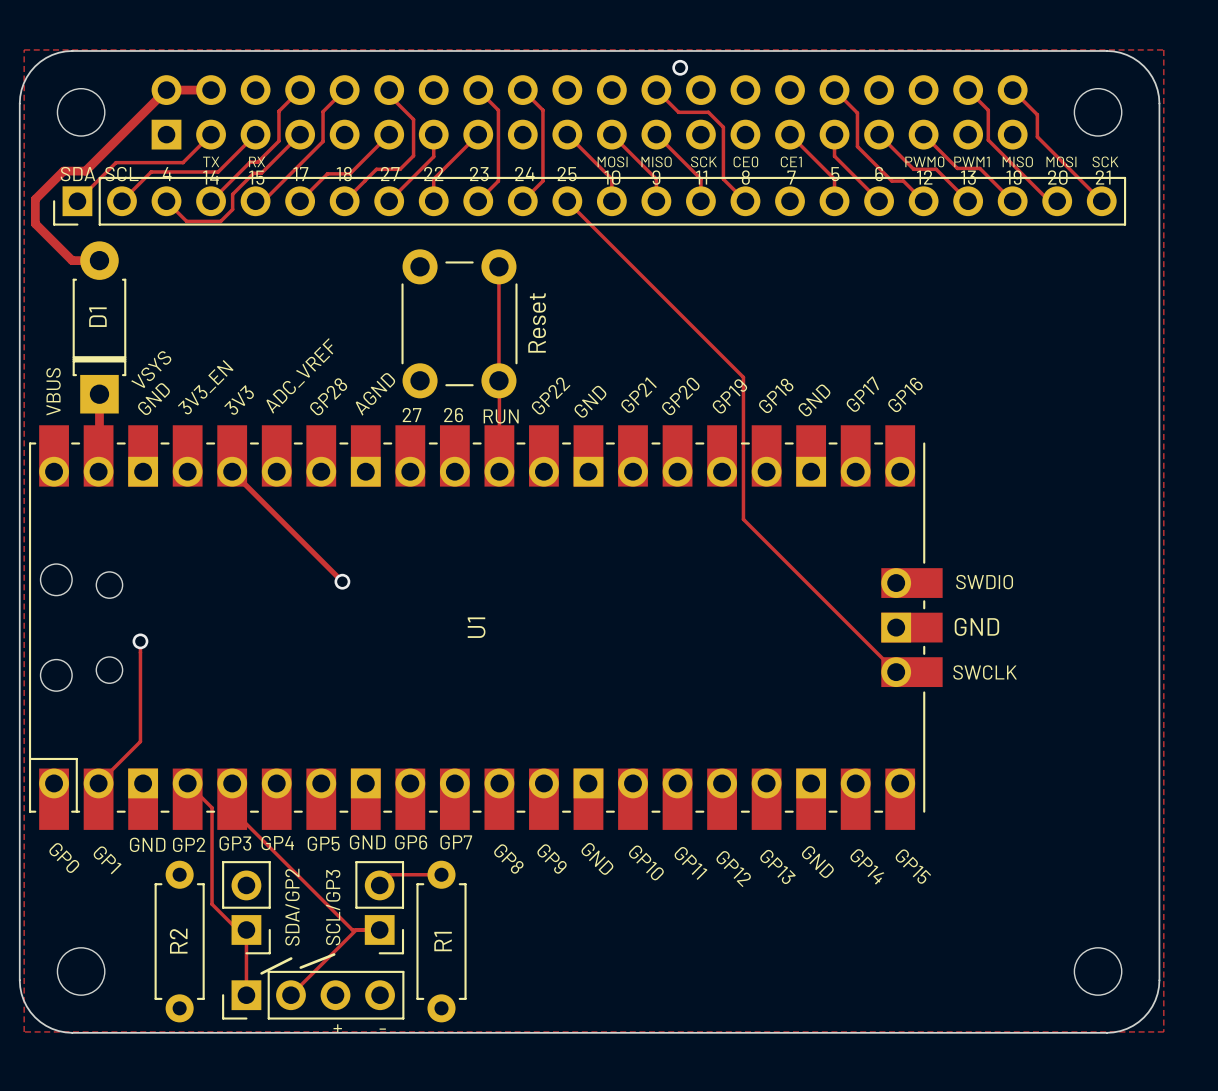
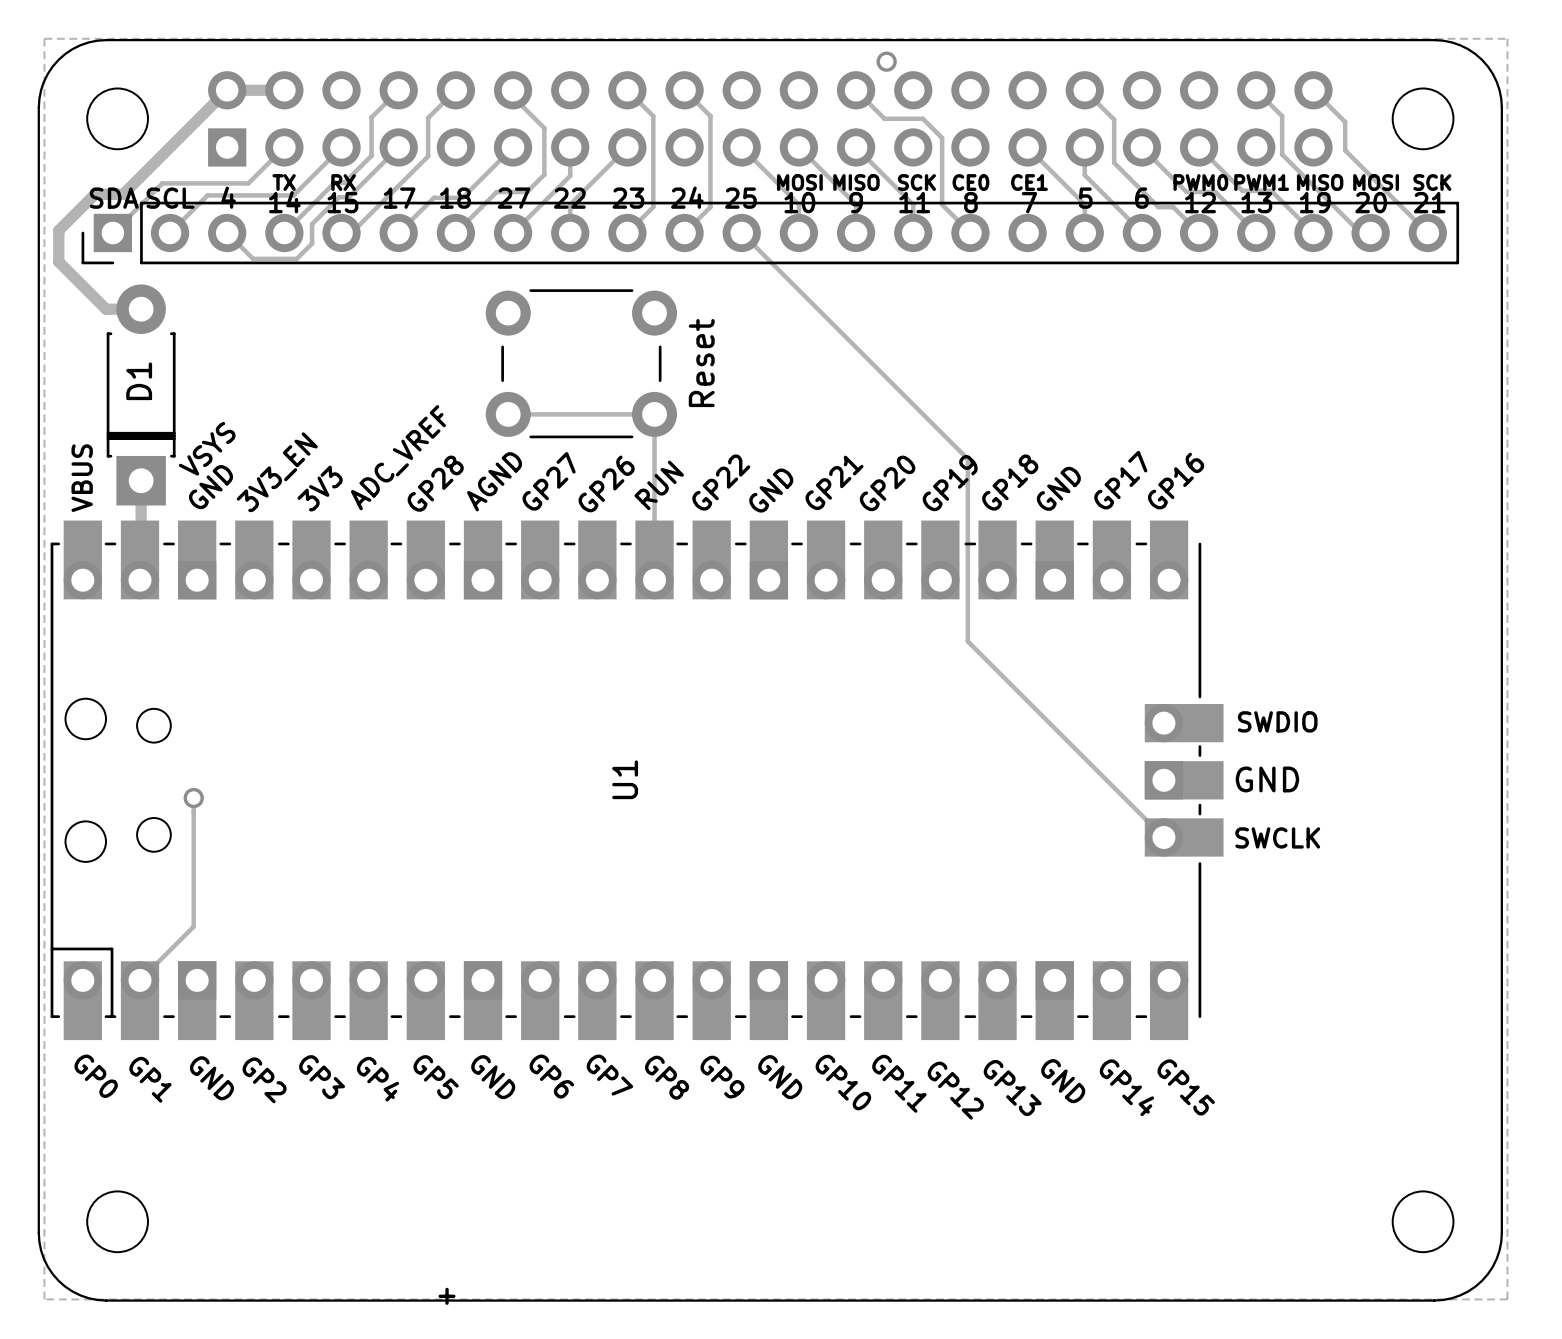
track: (498, 266) (499, 381) -> (508, 414) (654, 414) (654, 464)
text position: Reset (537, 322) -> Reset (701, 363)
part rotation: 0° (459, 323) -> 90° clockwise (581, 363)
U1 footprint: [28, 425, 943, 830] -> [50, 520, 1224, 1041]
track: (232, 471) (342, 581) -> none
via: (342, 581) -> none
track: (187, 783) (212, 807) (212, 904) (237, 929) (246, 929) (246, 995) -> none
track: (232, 783) (232, 809) (352, 929) (379, 929) -> none
track: (441, 874) (390, 874) (379, 885) -> none
part: (246, 907) -> none
text: SDA/GP2 (292, 907) -> none
text: SCL/GP3 (333, 907) -> none
part: (379, 907) -> none
track: (356, 929) (290, 995) -> none
R2: (179, 941) -> none
R1: (441, 941) -> none
line: (334, 954) (300, 967) -> none
line: (291, 958) (261, 973) -> none
part: (313, 995) -> none
text: - (382, 1029) -> none

